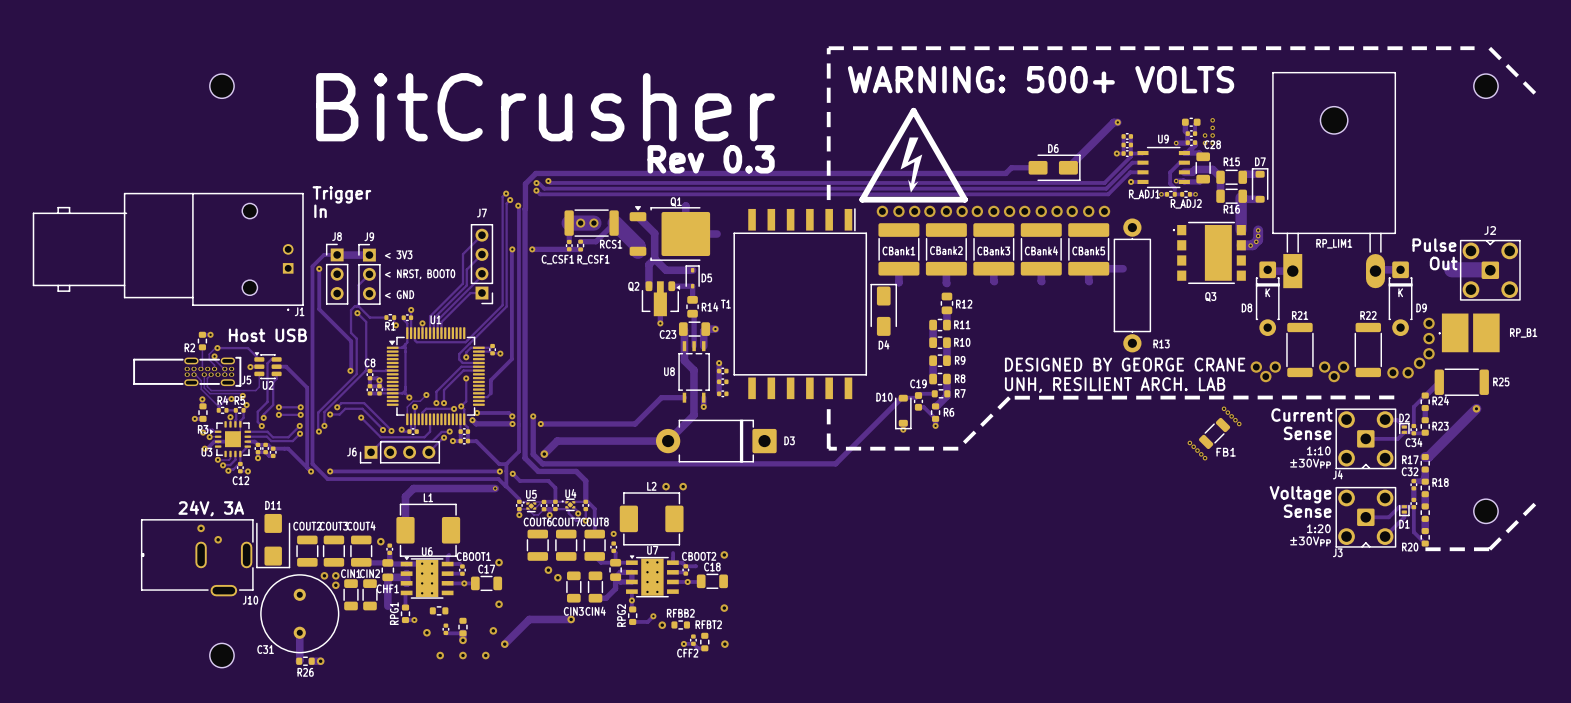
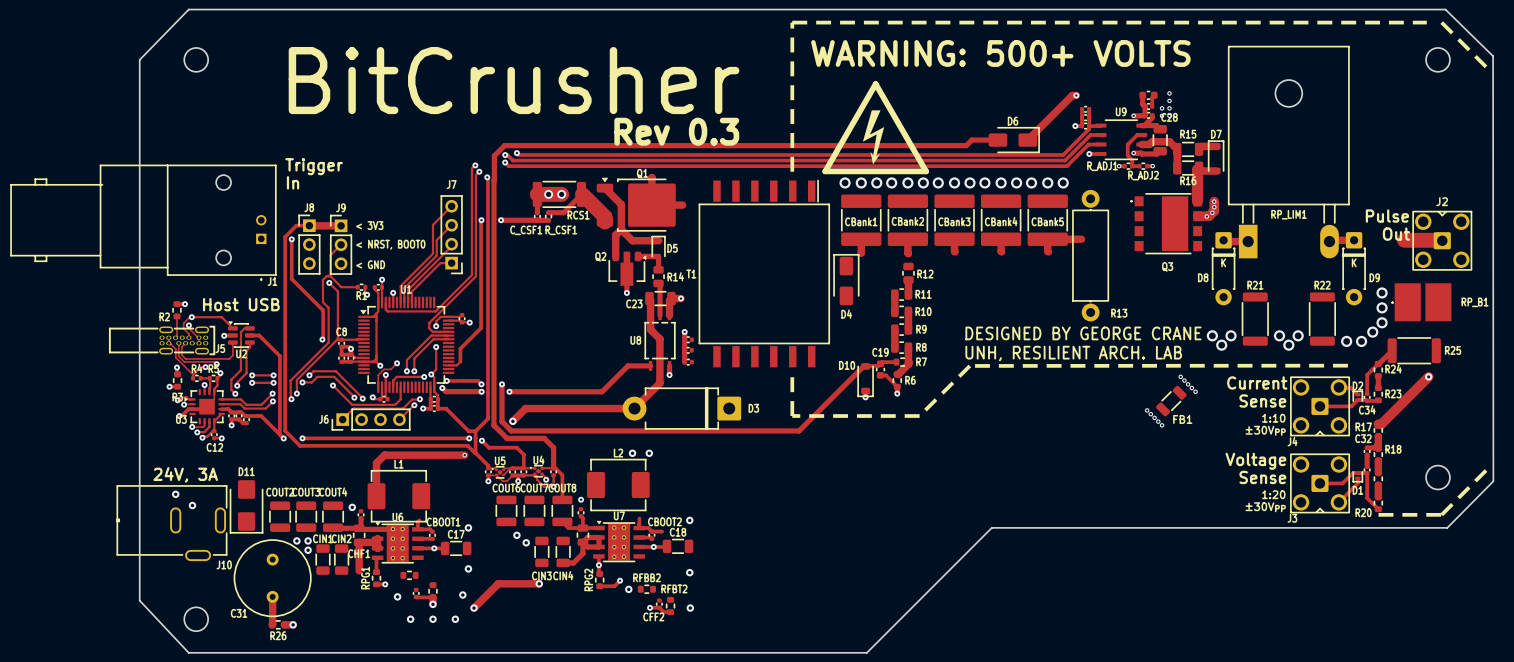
board edge: none -> (188, 9) (139, 59) (139, 600) (188, 652) (866, 652) (991, 527) (1447, 527) (1493, 481) (1493, 56) (1445, 9) (188, 9)

